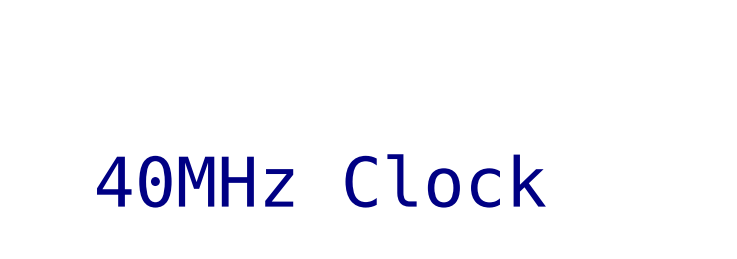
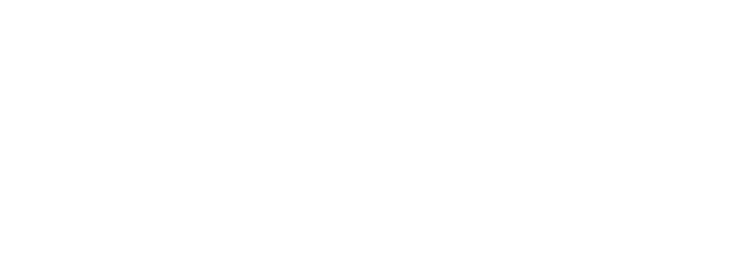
text: 40MHz Clock (321, 180) -> none

